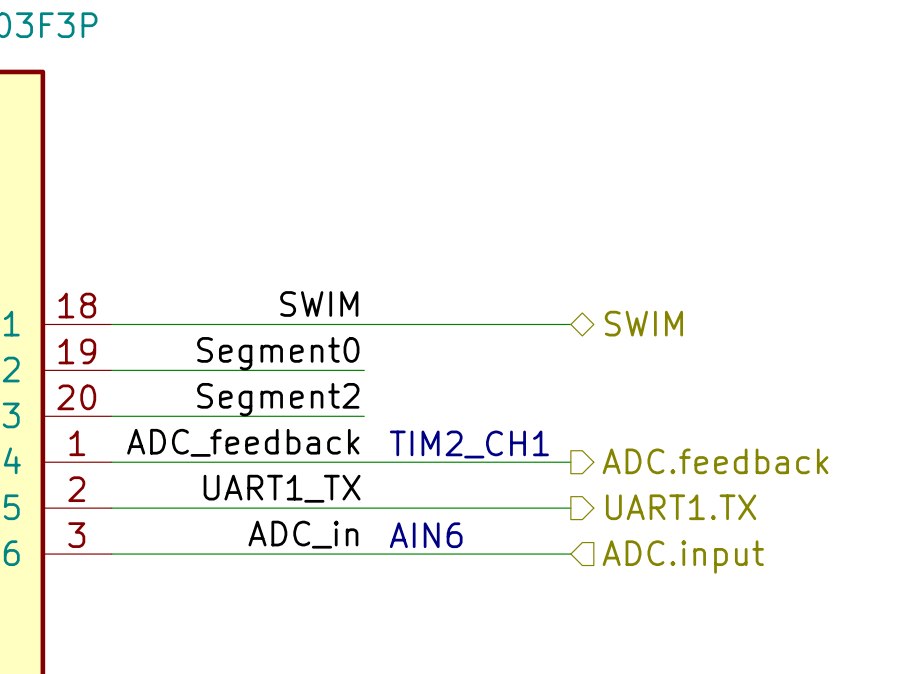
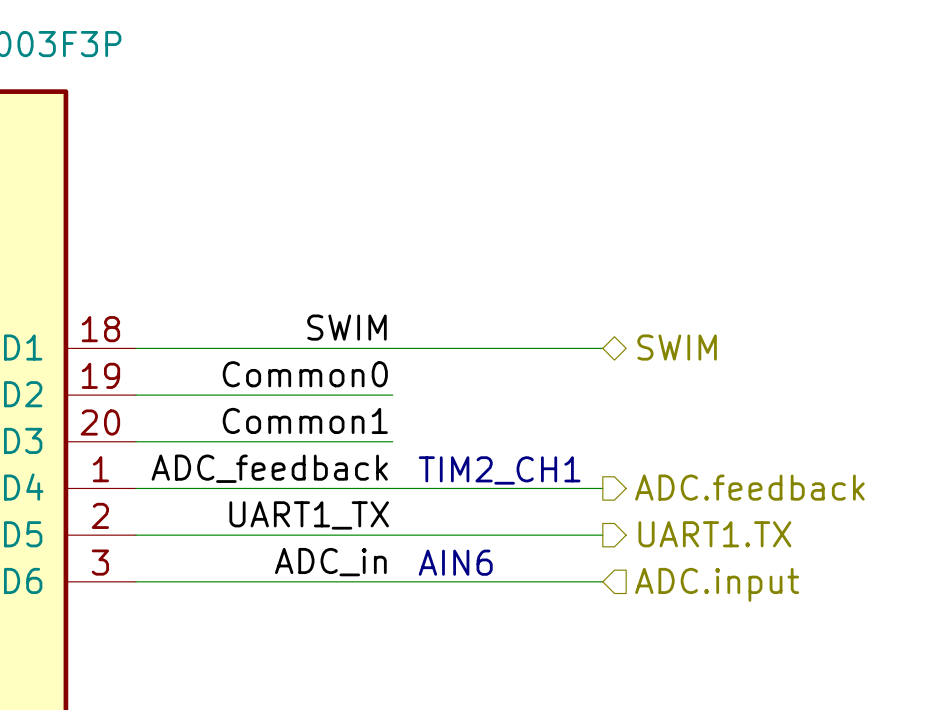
label: Segment0 (278, 353) -> Common0 (305, 374)
label: Segment2 (278, 399) -> Common1 (305, 420)

